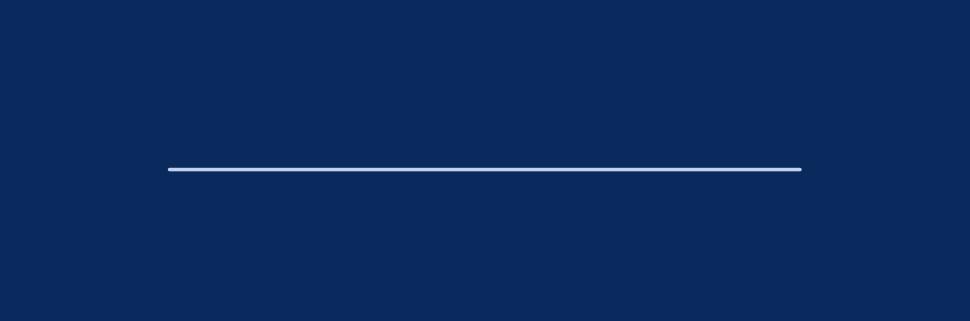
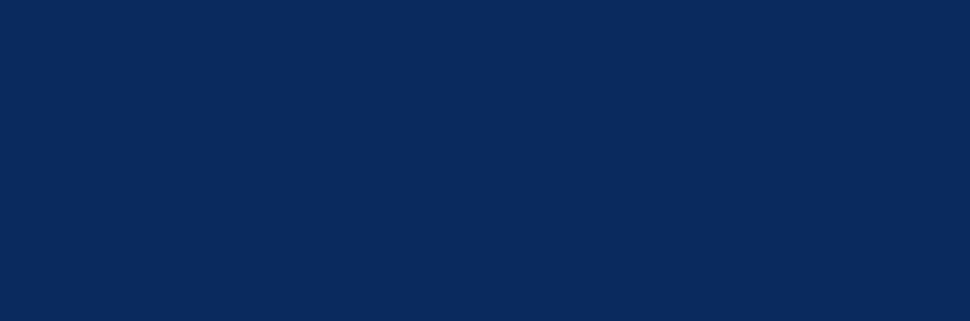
board edge: (169, 169) (800, 169) -> none

